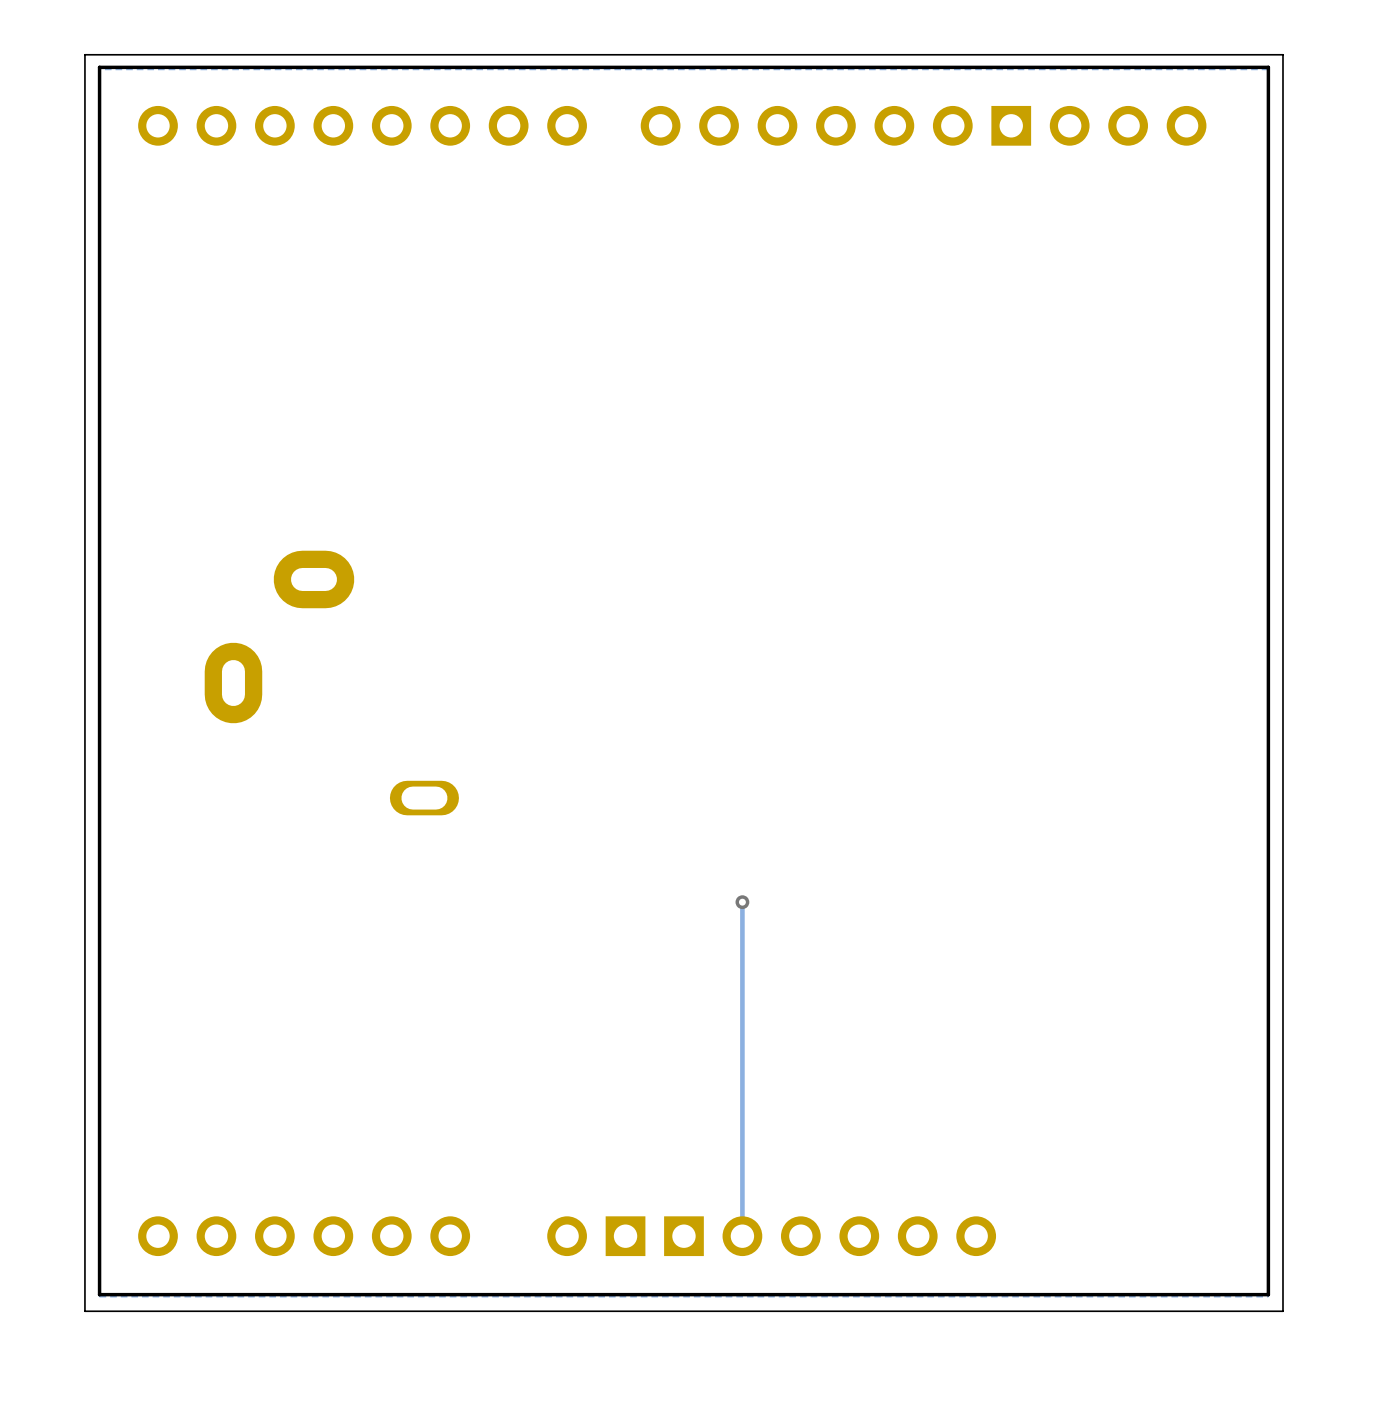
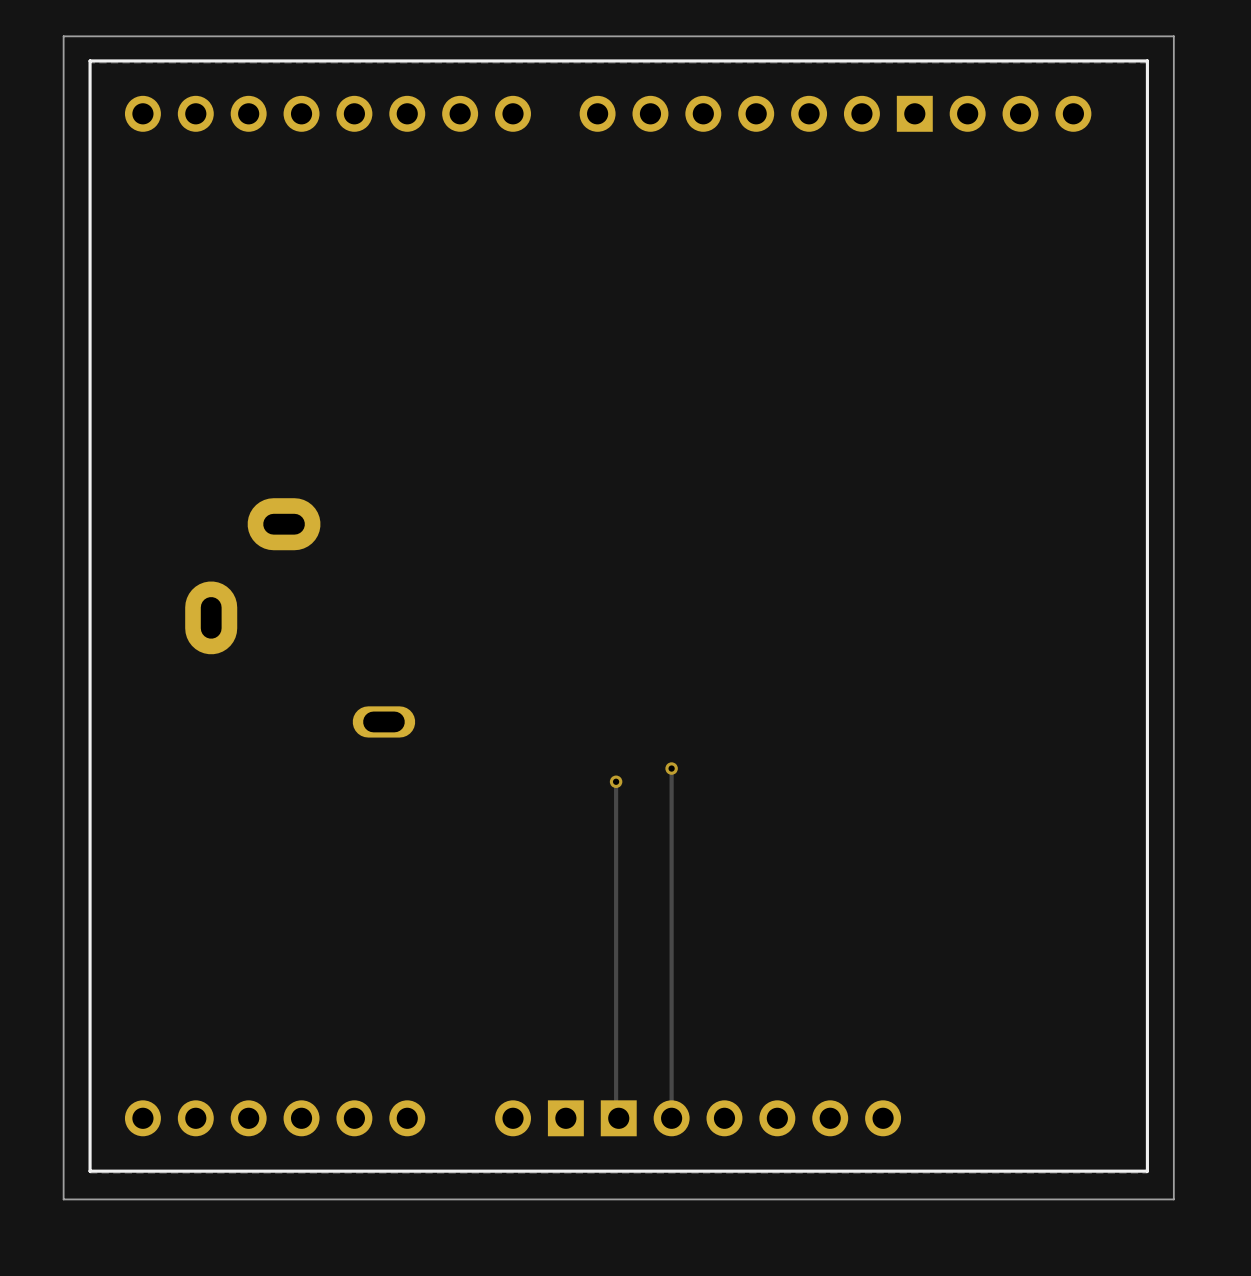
board edge: (1282, 54) (84, 54) (84, 1311) (1282, 1311) (1282, 54) -> (1173, 36) (1173, 1199) (63, 1199) (63, 36) (1173, 36)
track: none -> (671, 768) (671, 816)
via: none -> (671, 768)
track: none -> (616, 781) (616, 1115) (618, 1118)
via: none -> (616, 781)
via: (742, 902) -> none

